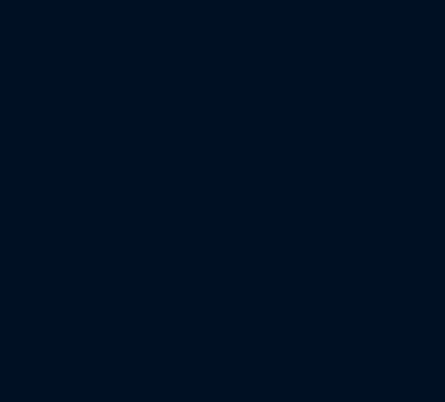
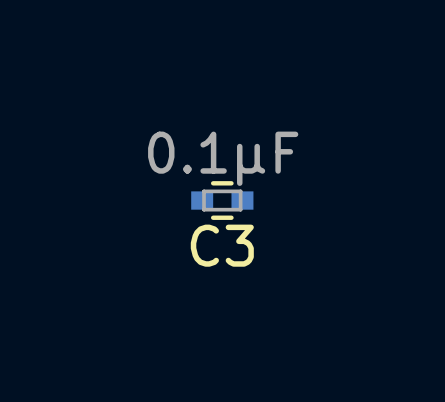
C3: none -> 0.1µF (222, 200)

